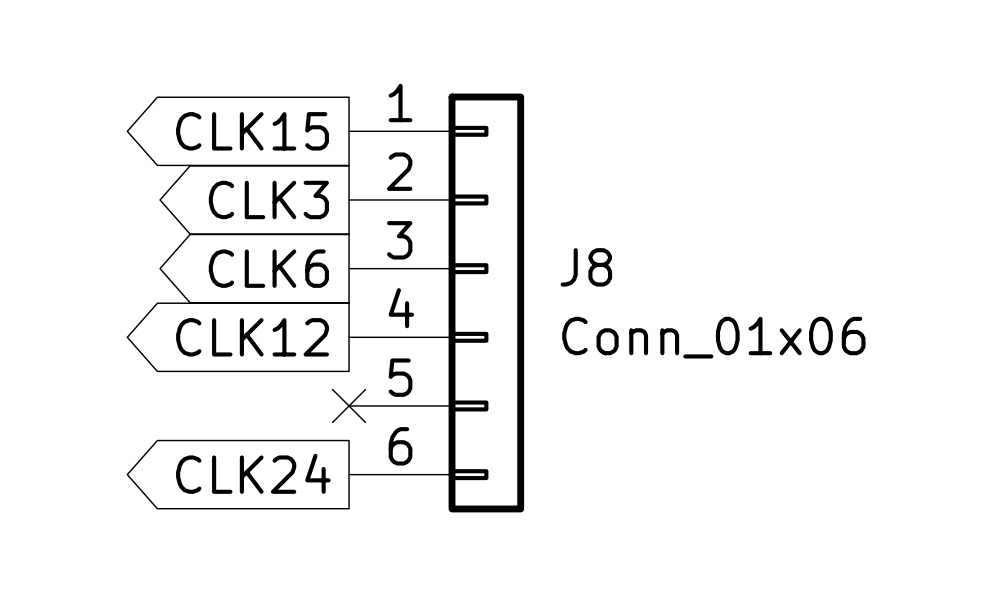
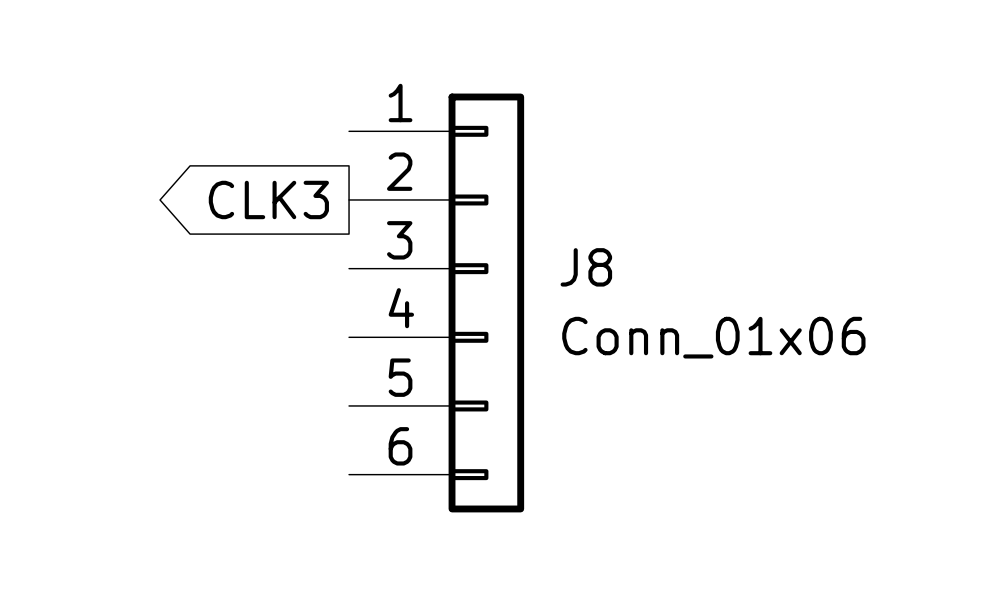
global label: CLK15 (252, 131) -> none
global label: CLK6 (268, 268) -> none
global label: CLK12 (252, 337) -> none
no-connect mark: (349, 405) -> none
global label: CLK24 (253, 473) -> none

